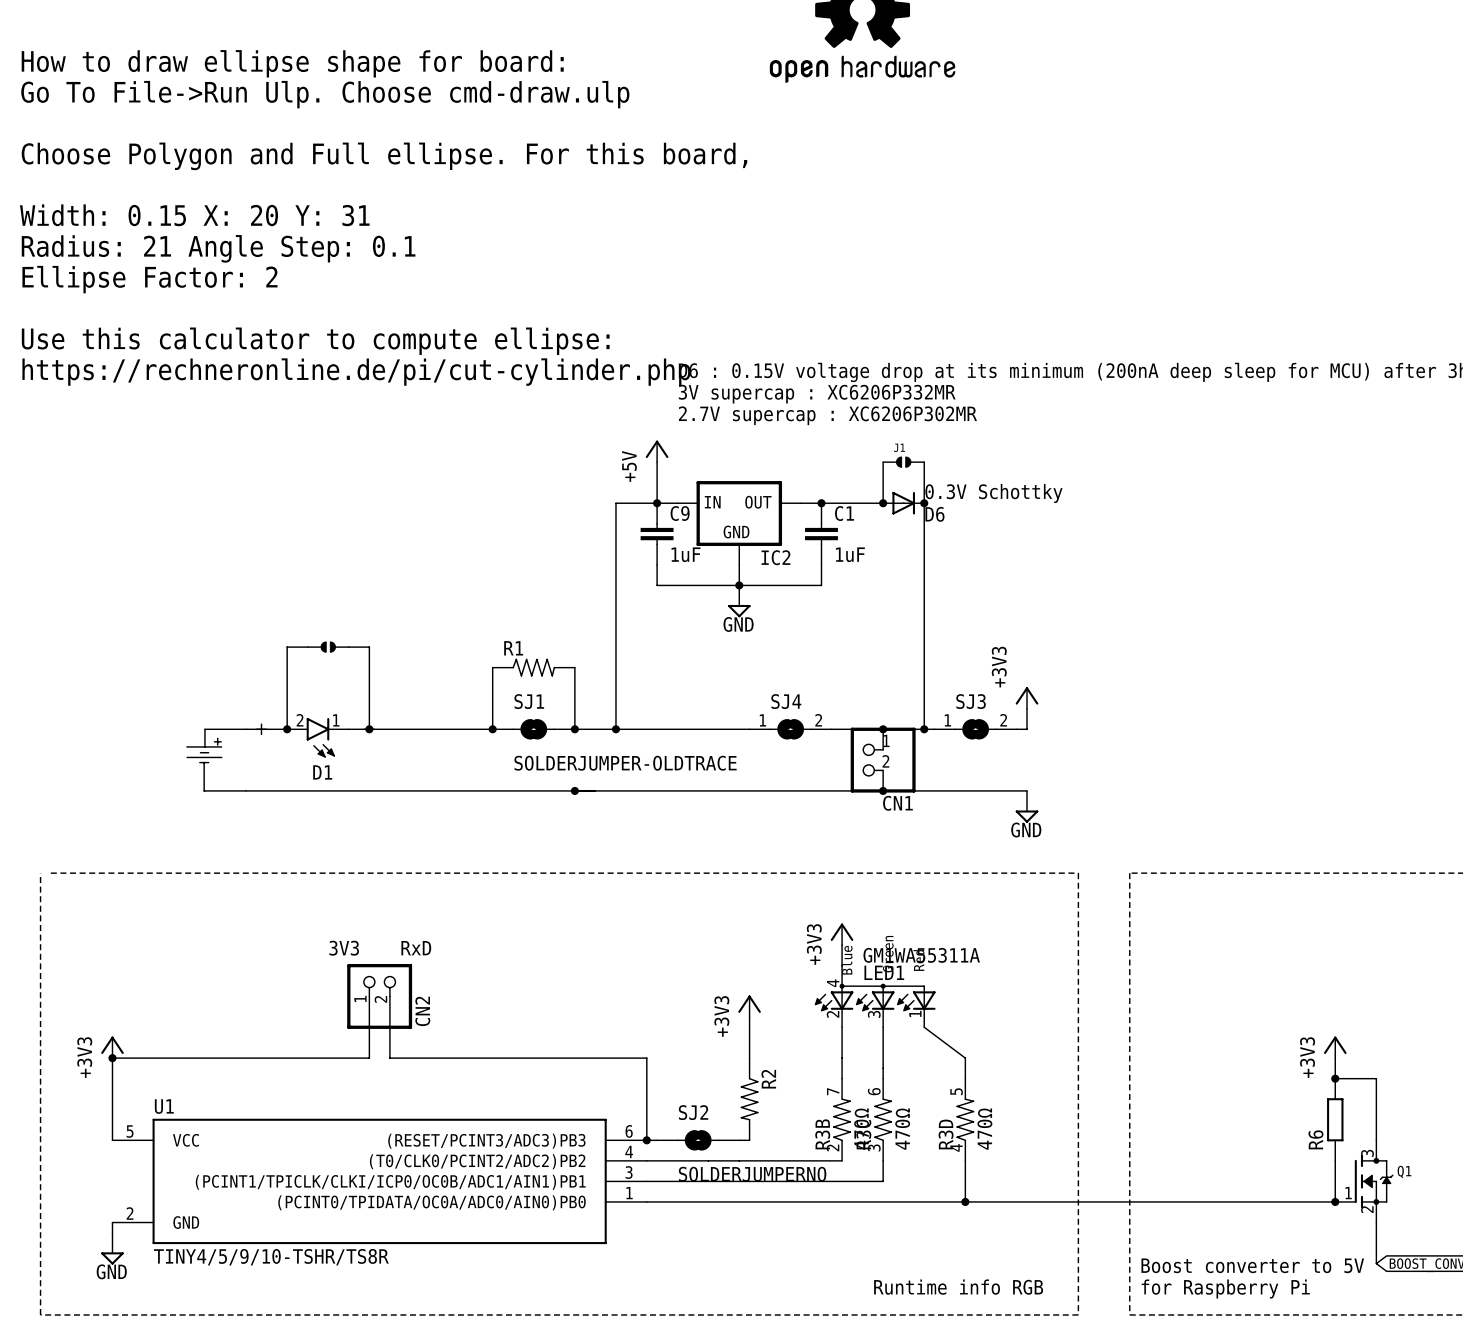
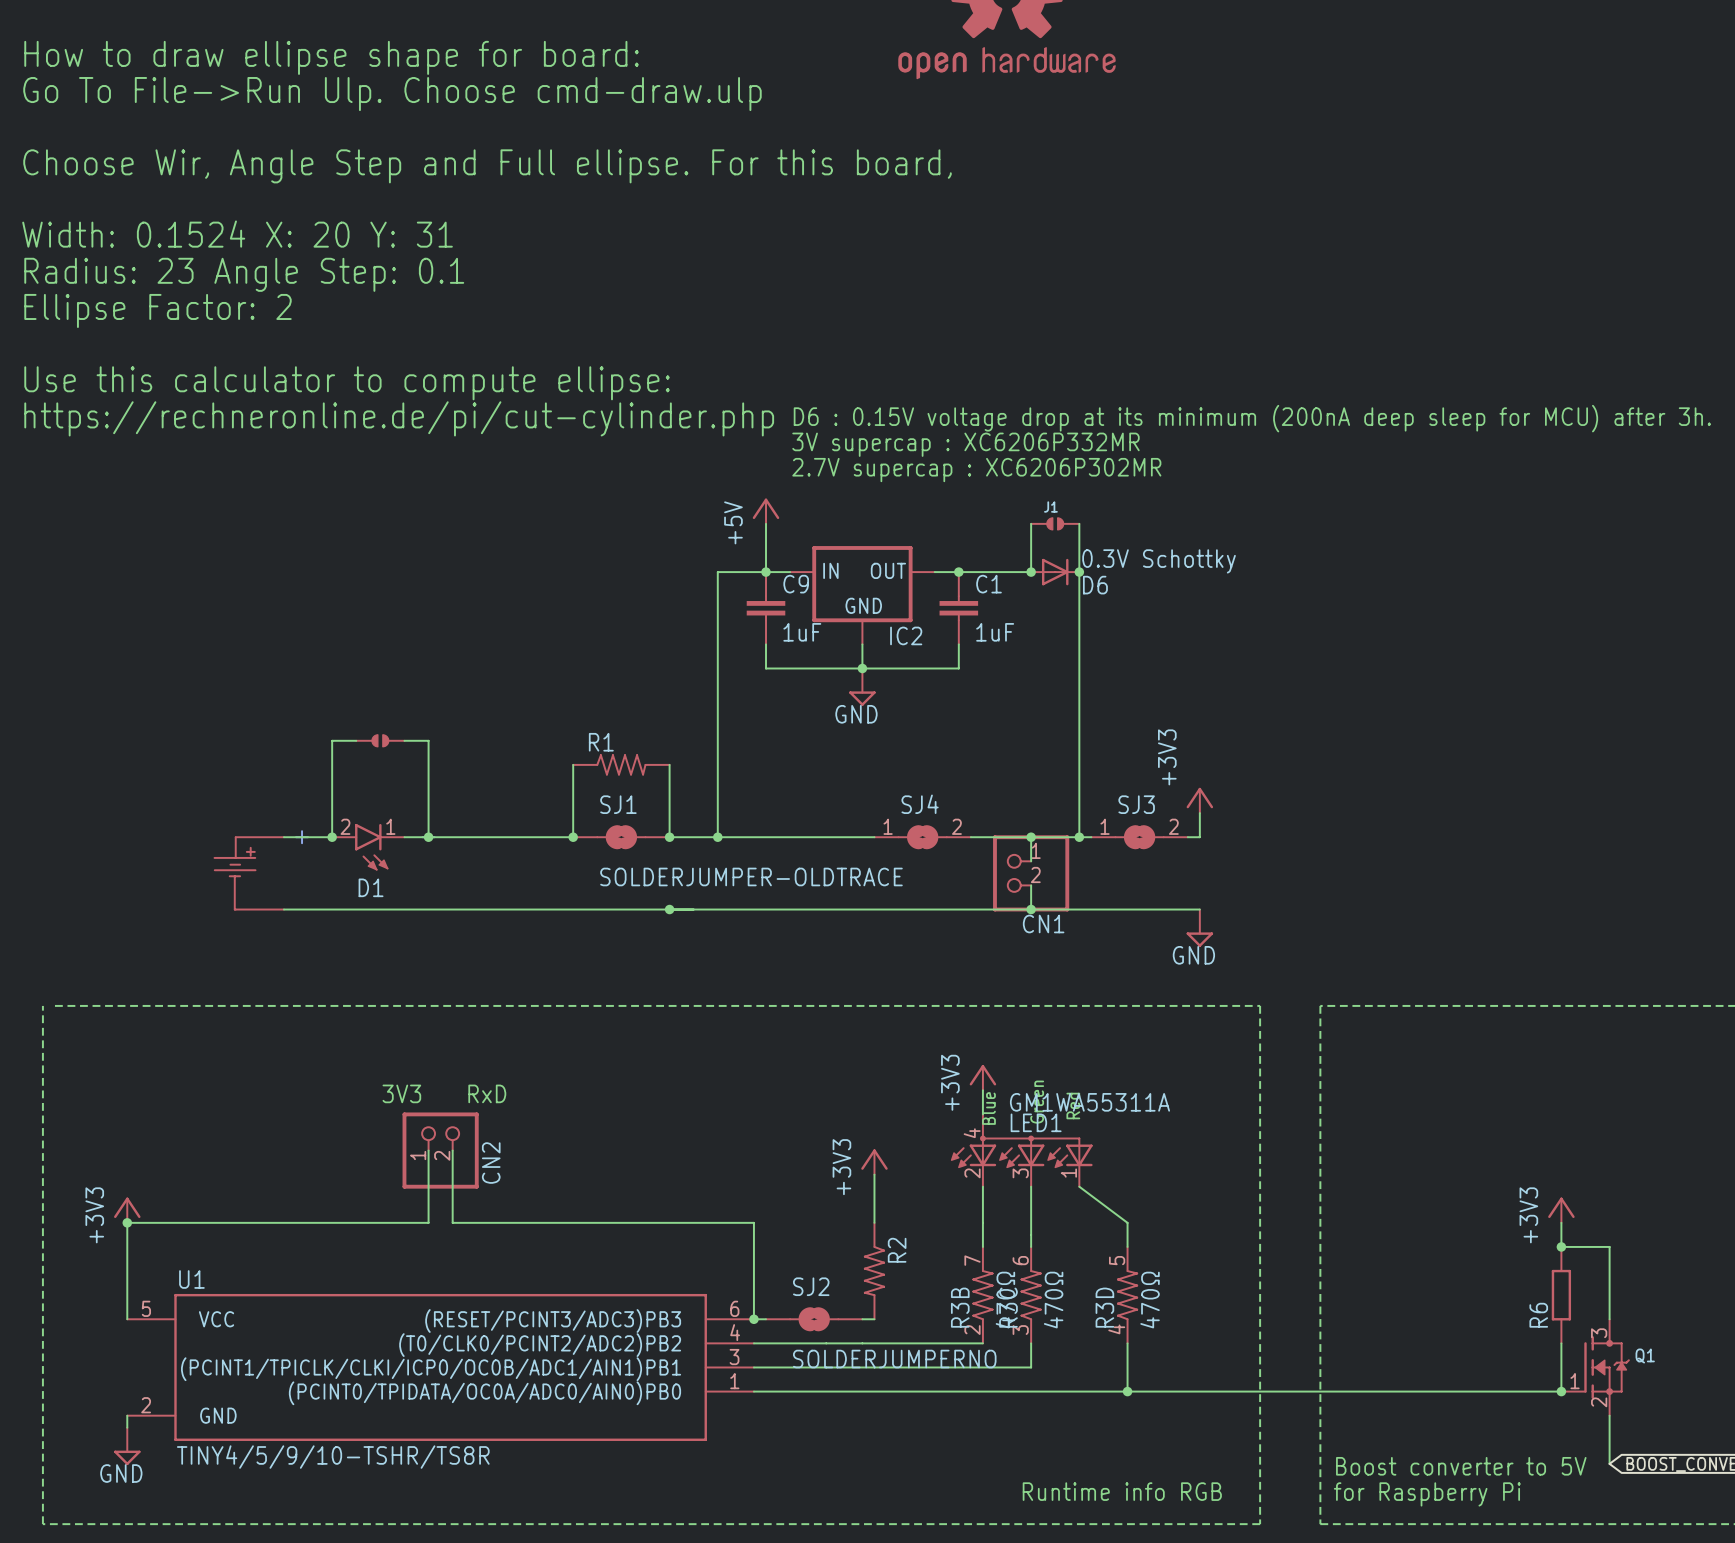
text: Choose Polygon and Full ellipse. For this board, (384, 156) -> Choose Wir, Angle Step and Full ellipse. For this board, (487, 166)
text: Width: 0.15 X: 20 Y: 31 (194, 215) -> Width: 0.1524 X: 20 Y: 31 (237, 234)
text: Radius: 21 Angle Step: 0.1 (218, 248) -> Radius: 23 Angle Step: 0.1 (244, 274)

